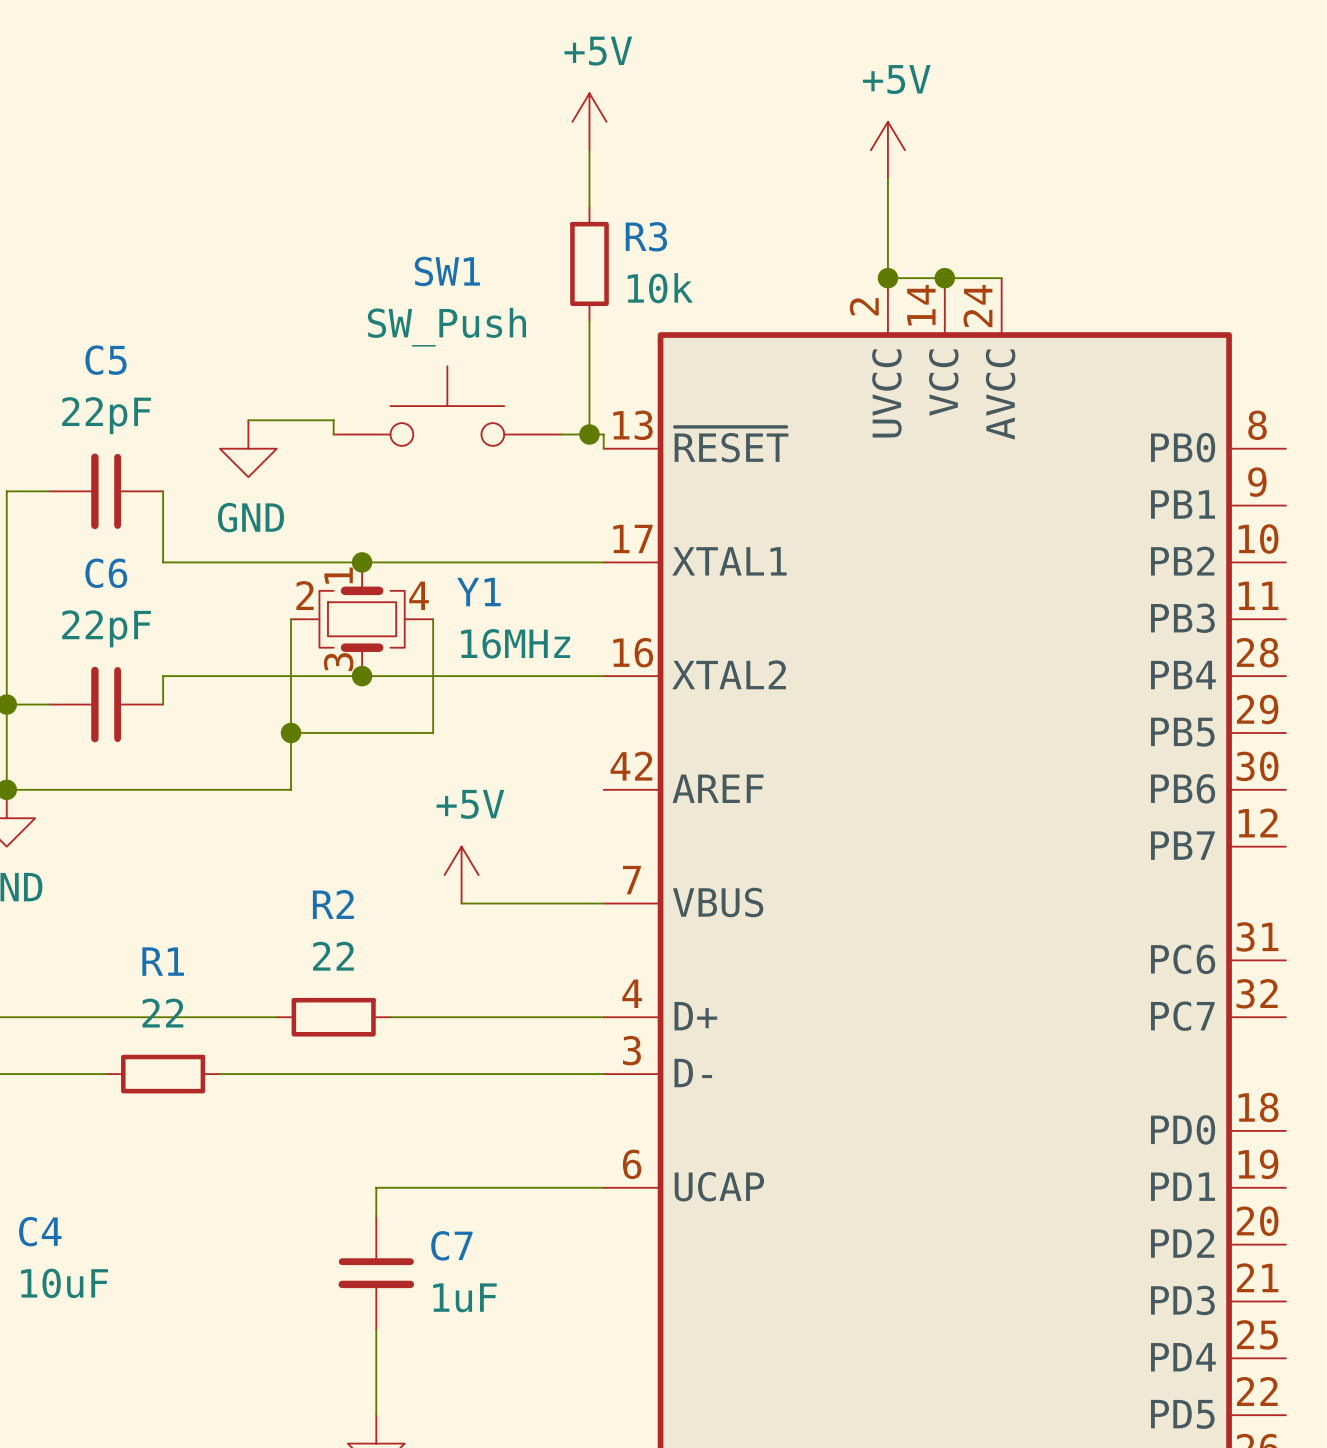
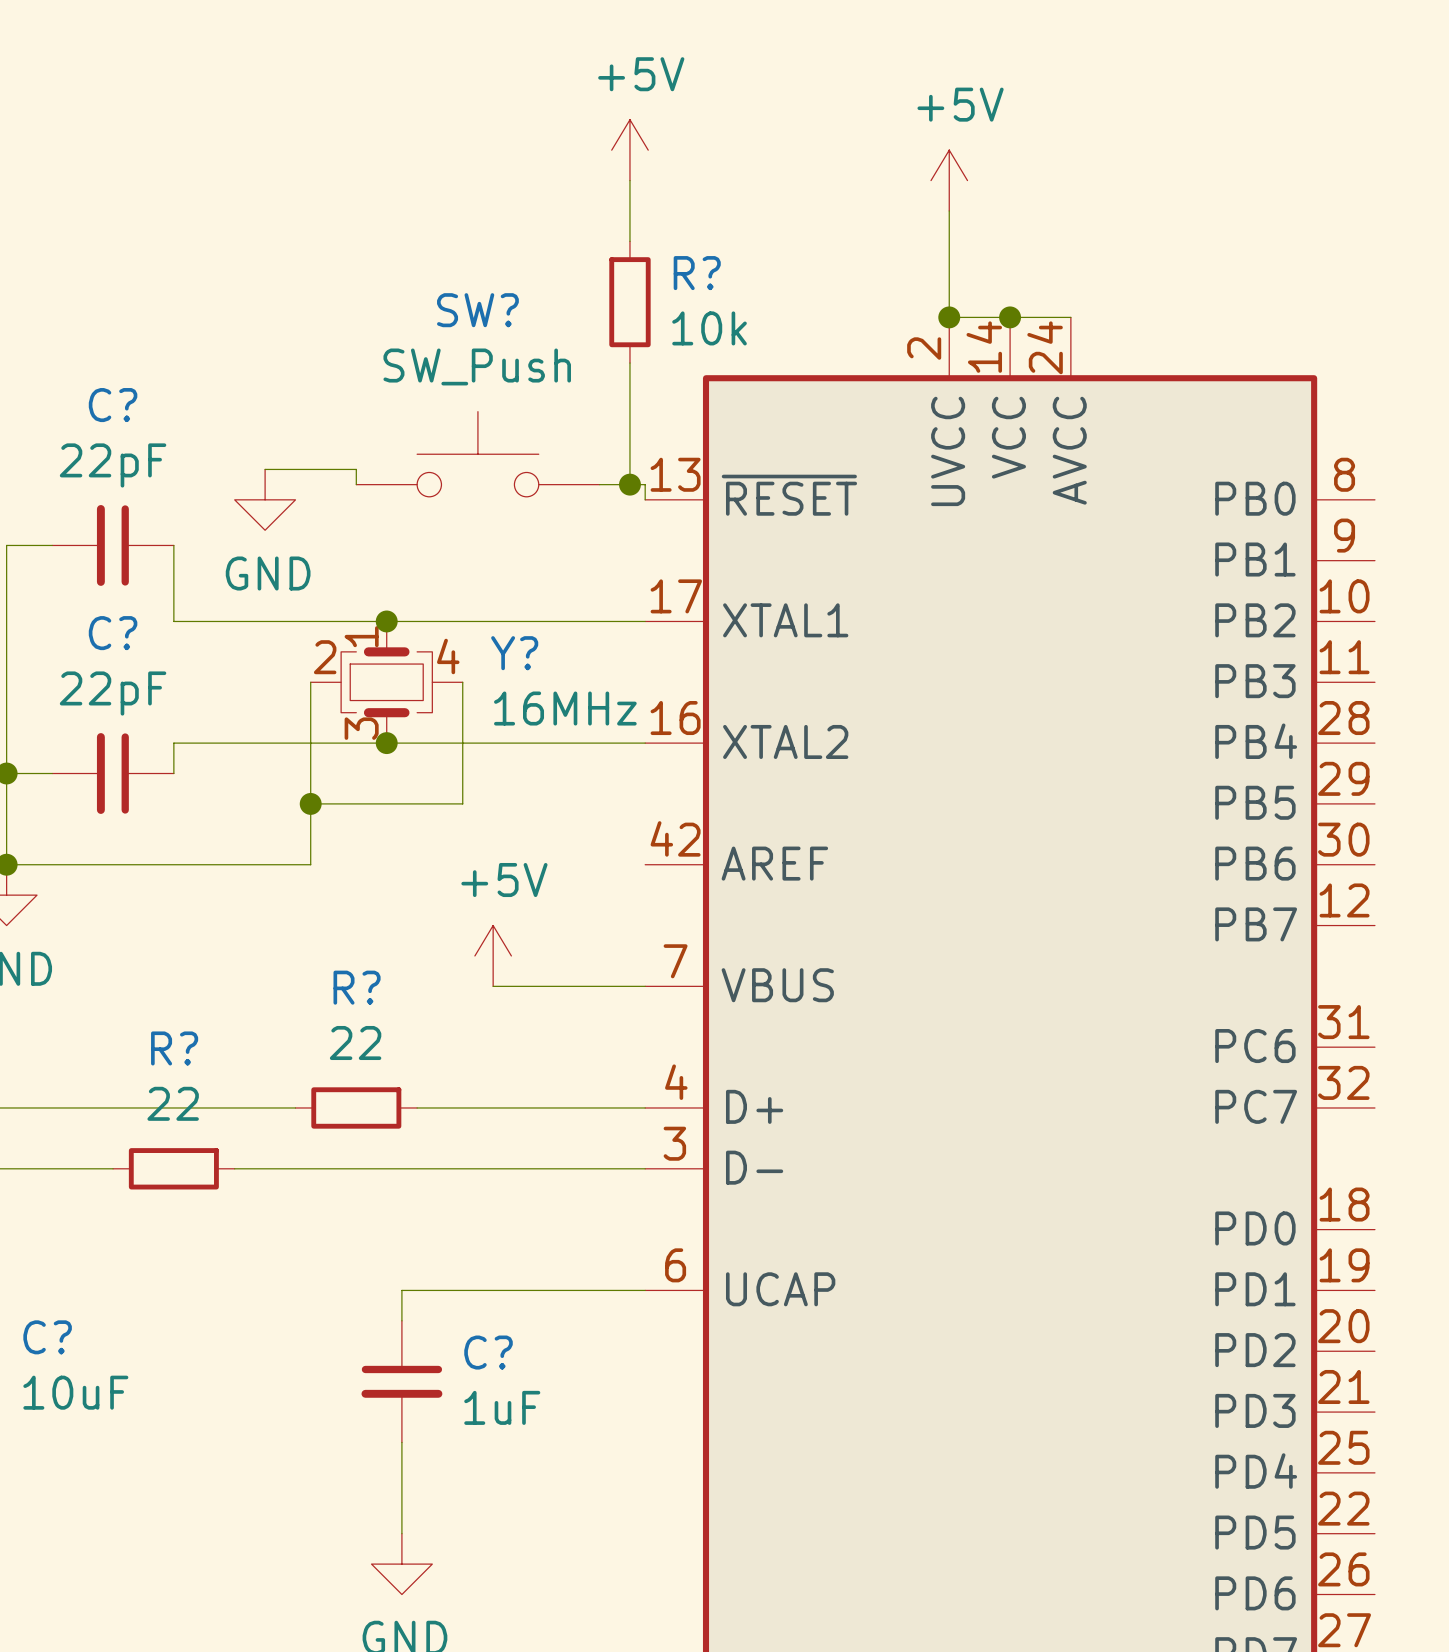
R3 name: R3 (646, 236) -> R? (697, 273)
SW1 name: SW1 (447, 271) -> SW? (477, 310)
C5 name: C5 (106, 360) -> C? (113, 405)
C6 name: C6 (106, 573) -> C? (113, 633)
Y1 name: Y1 (478, 592) -> Y? (514, 653)
R2 name: R2 (333, 904) -> R? (357, 987)
R1 name: R1 (163, 961) -> R? (174, 1048)
C4 name: C4 (40, 1231) -> C? (47, 1337)
C7 name: C7 (451, 1245) -> C? (488, 1352)

